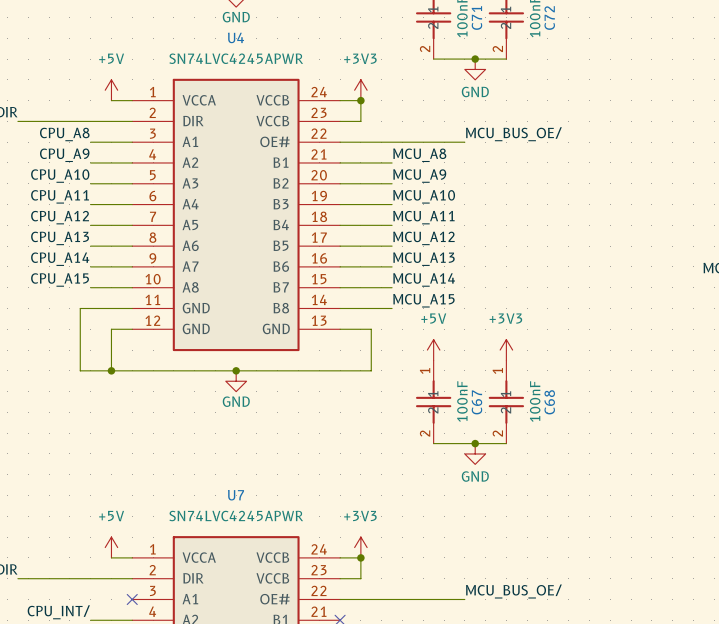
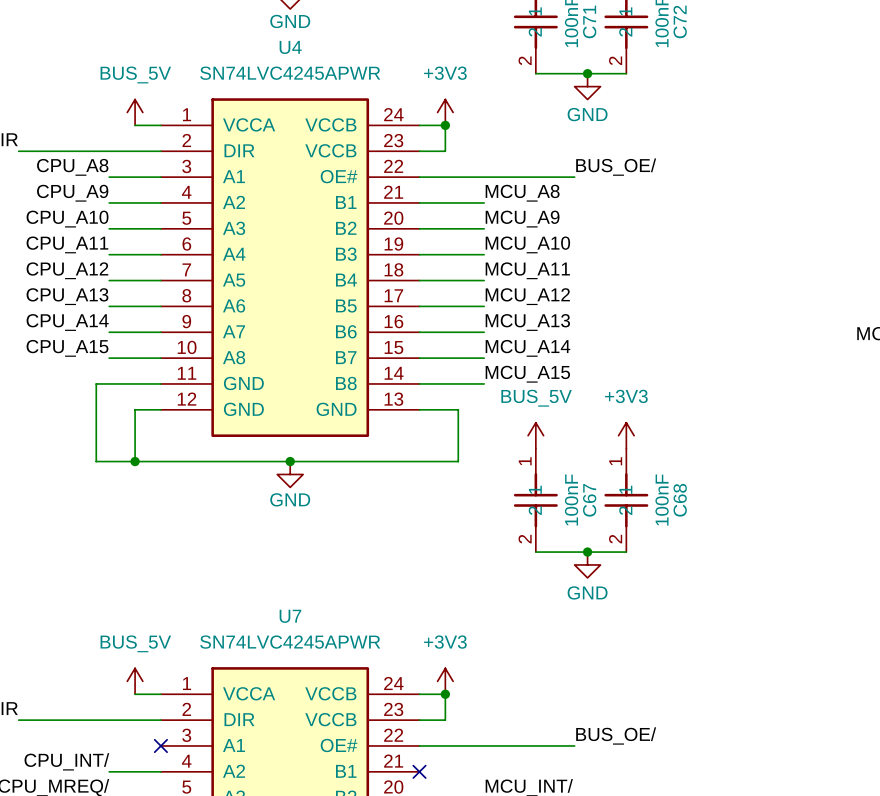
power symbol: +5V (111, 90) -> BUS_5V (135, 112)
label: MCU_BUS_OE/ (513, 134) -> BUS_OE/ (616, 167)
power symbol: +5V (433, 350) -> BUS_5V (535, 435)
power symbol: +5V (111, 547) -> BUS_5V (135, 681)
label: MCU_BUS_OE/ (513, 591) -> BUS_OE/ (616, 735)

